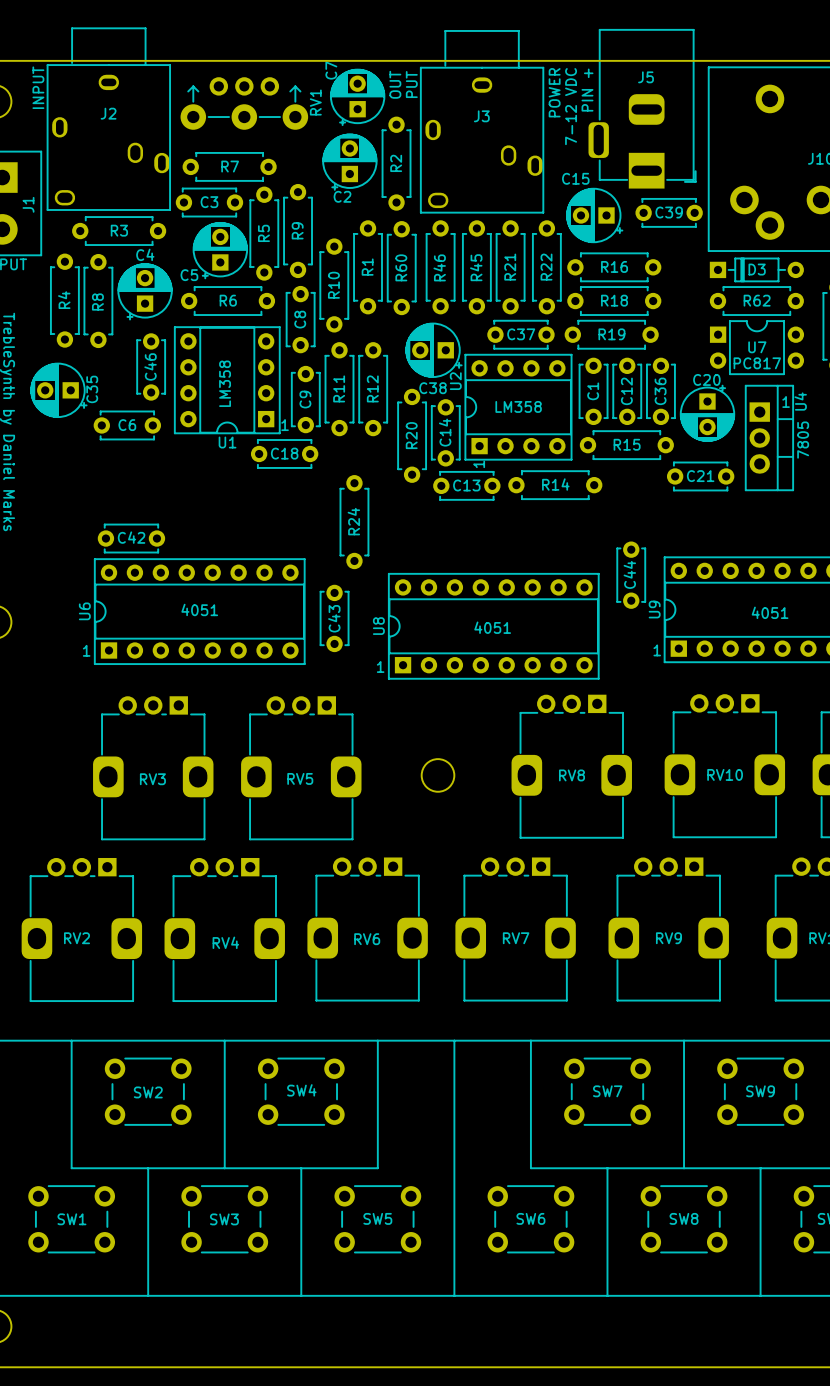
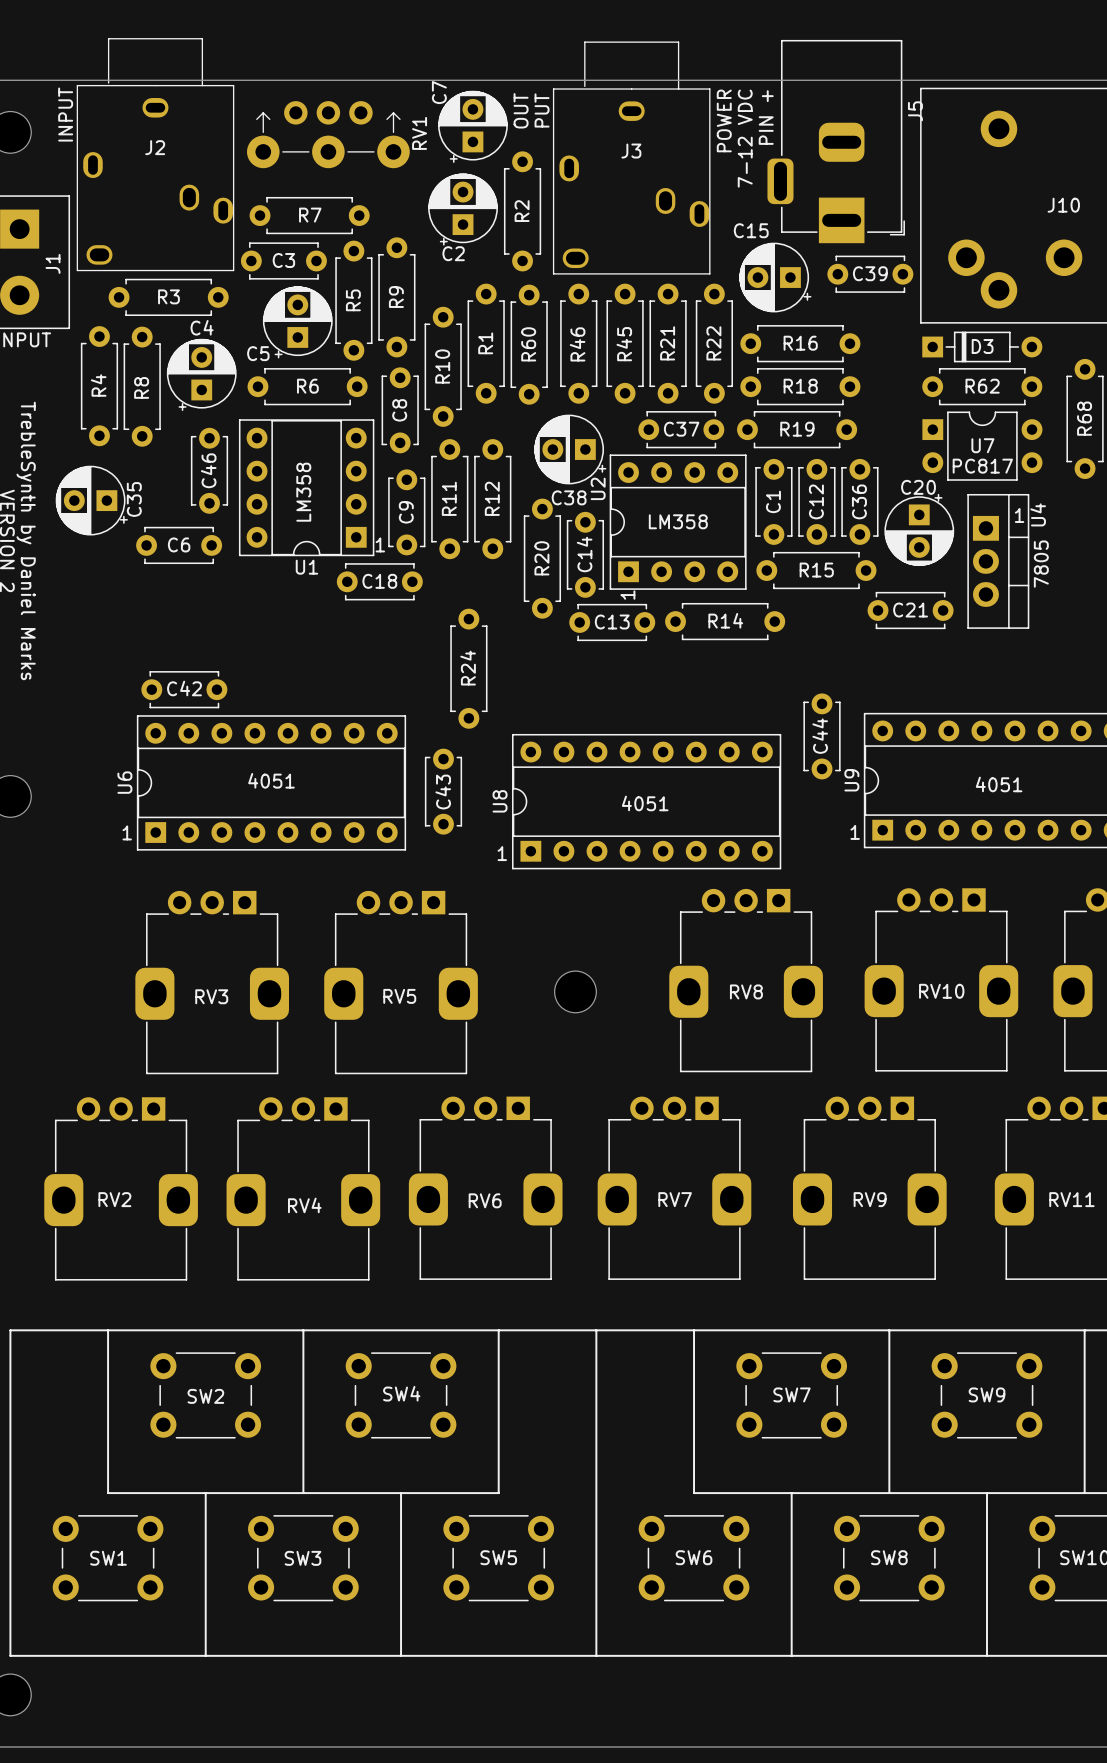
J5 name rotation: 0° (646, 77) -> 90° counterclockwise (915, 111)
J5 name position: J5 (646, 77) -> J5 (915, 111)

